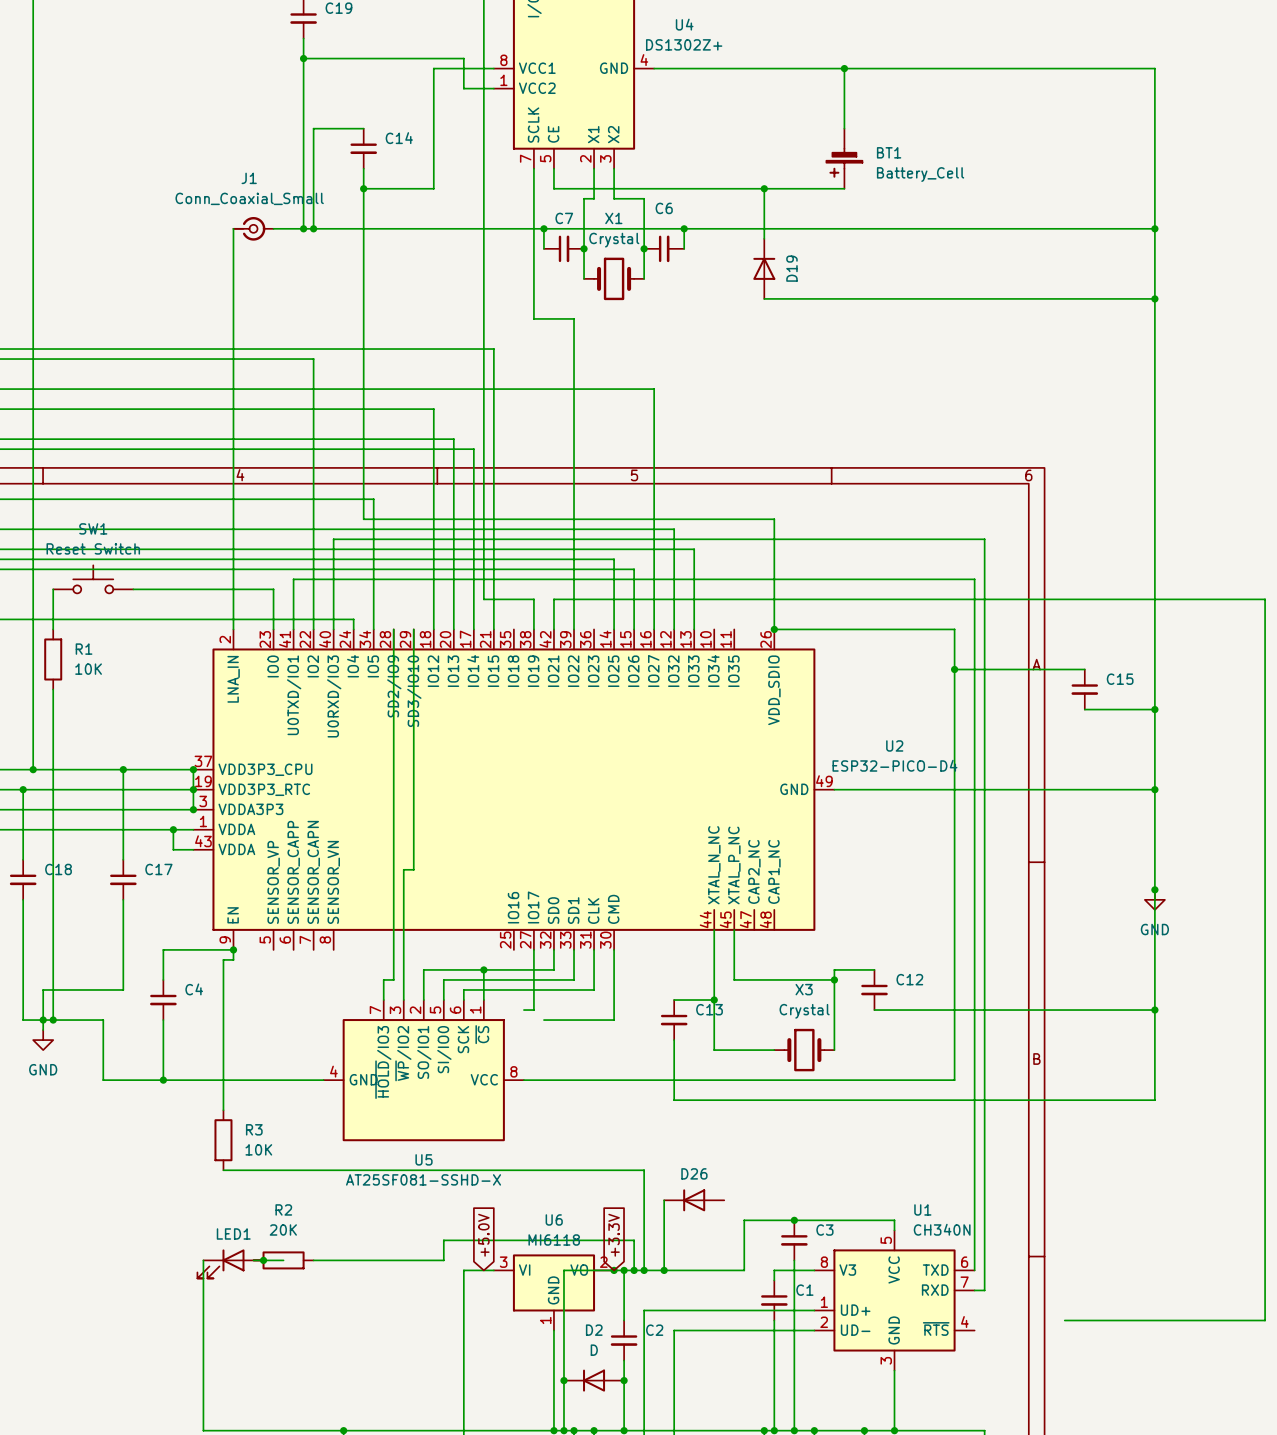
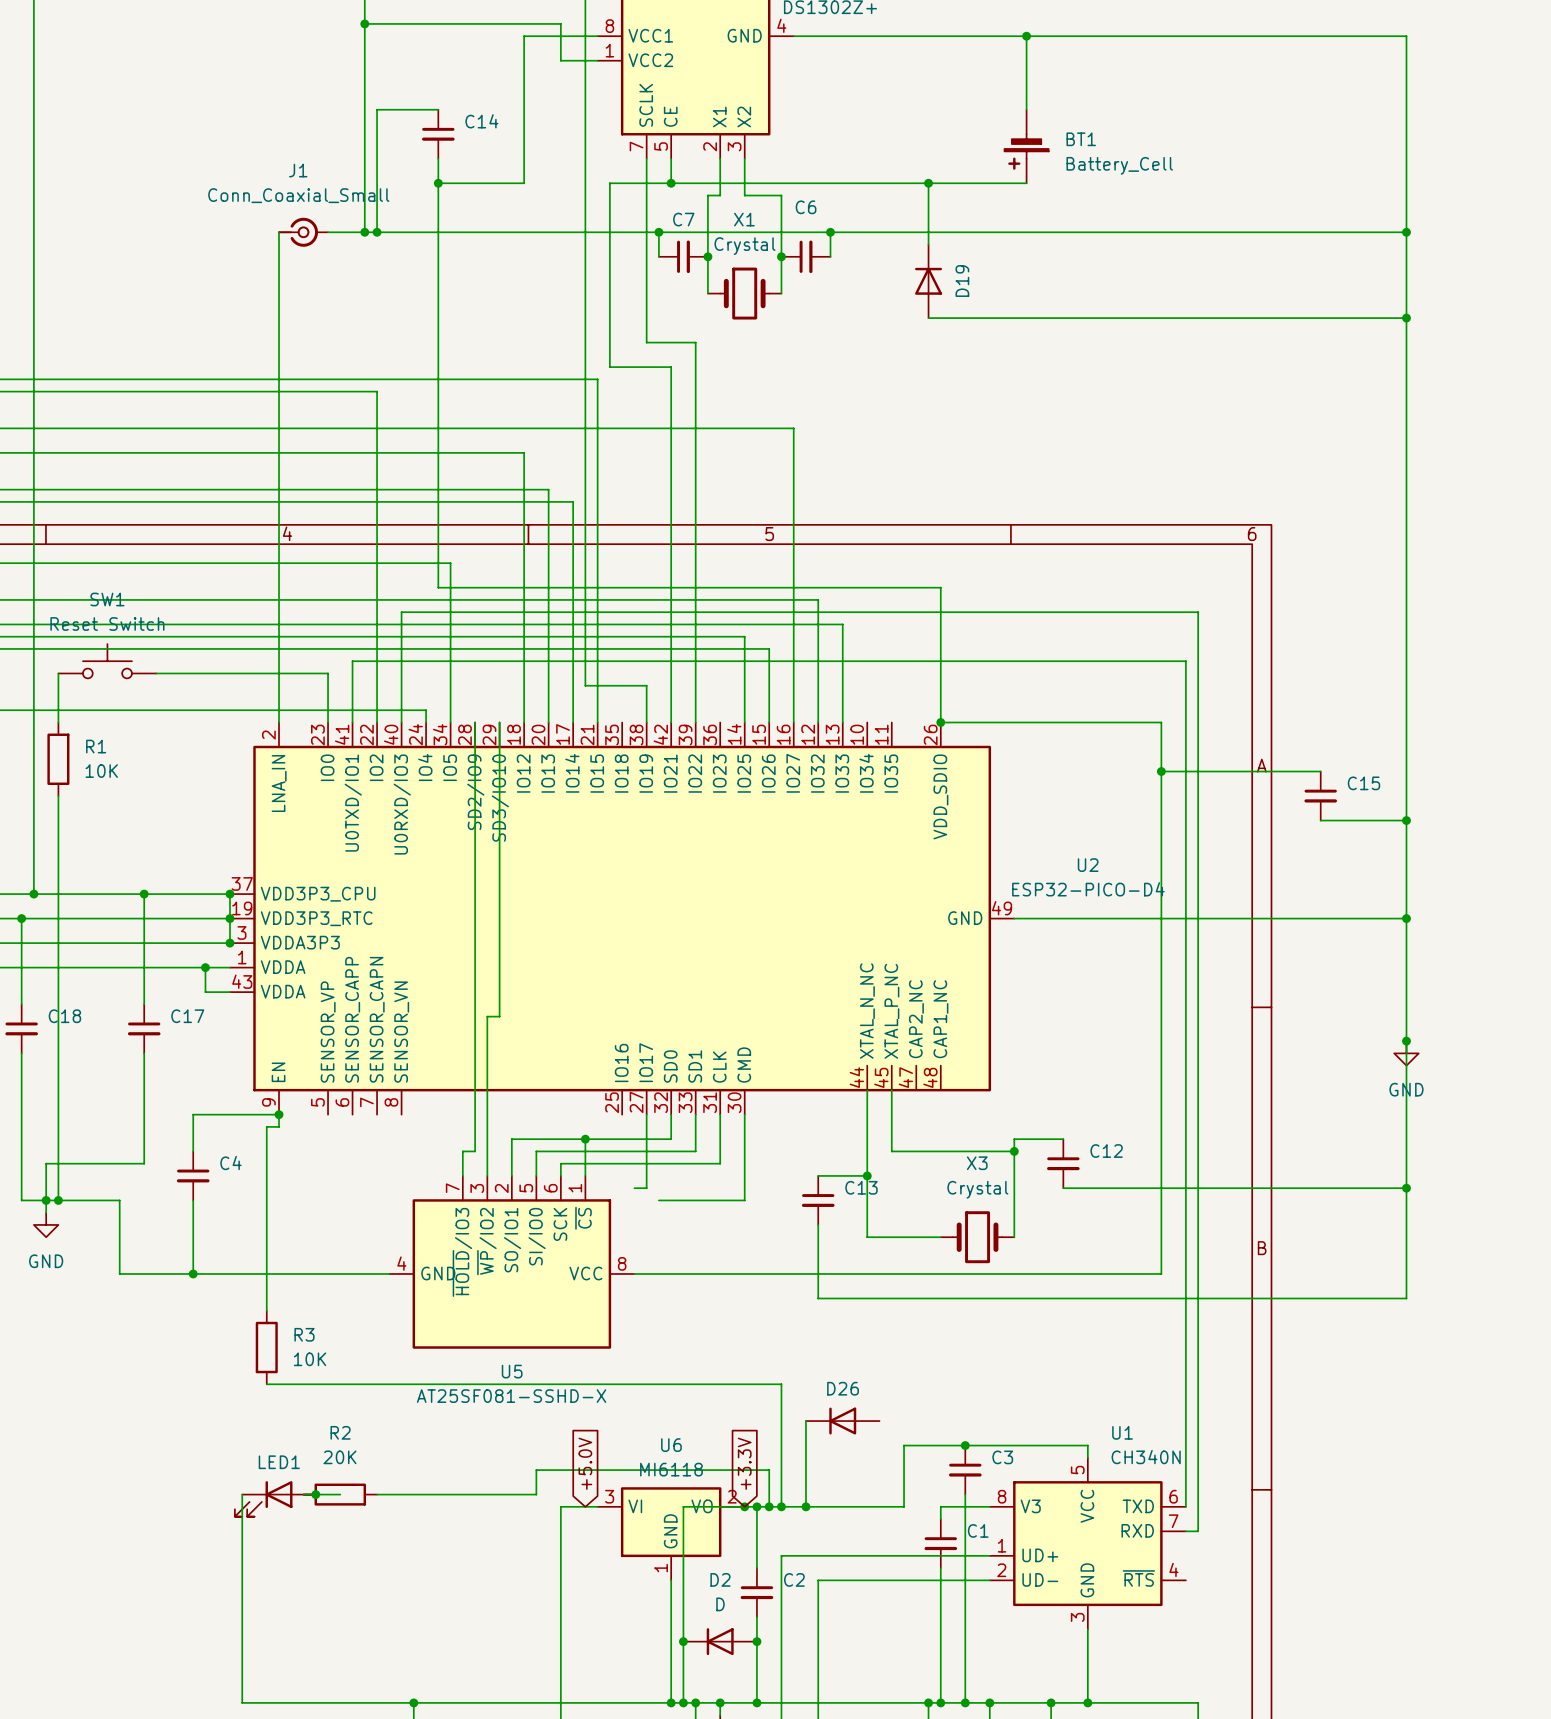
junction: none -> (671, 183)
wire: (553, 599) (1265, 599) (1265, 1320) (1064, 1320) -> (671, 685) (671, 367) (609, 367) (609, 183) (671, 183)

